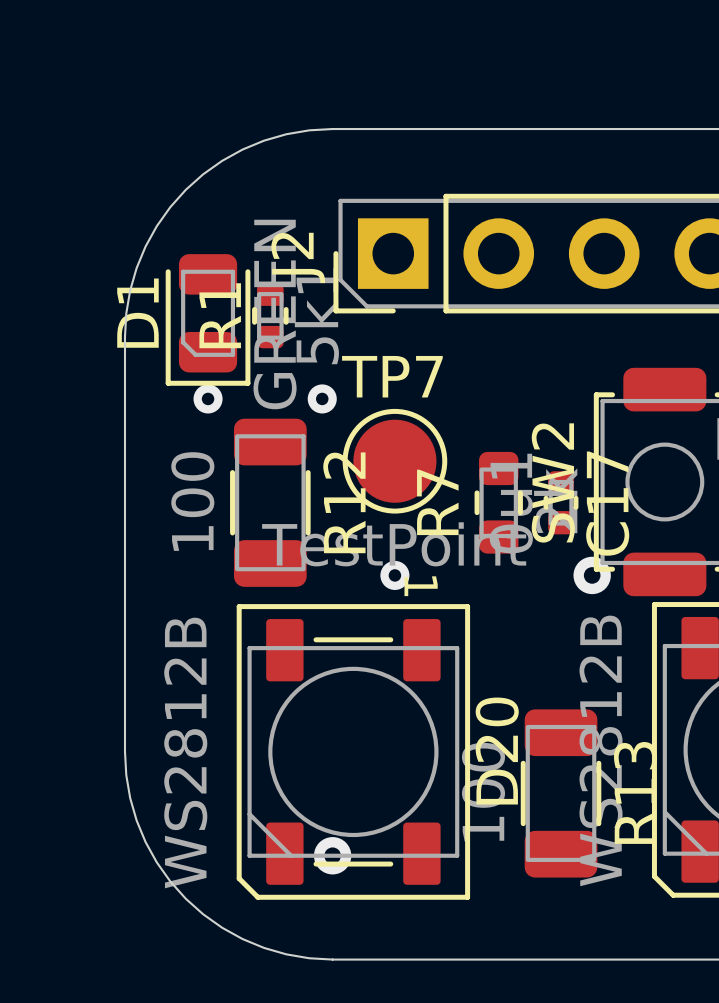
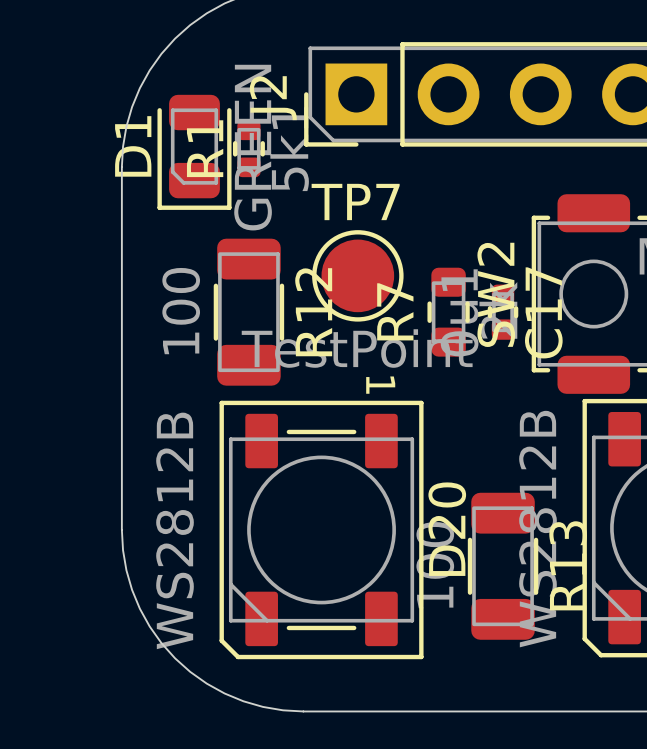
via: (208, 398) -> none
via: (322, 398) -> none
via: (394, 575) -> none
via: (592, 575) -> none
via: (332, 855) -> none

